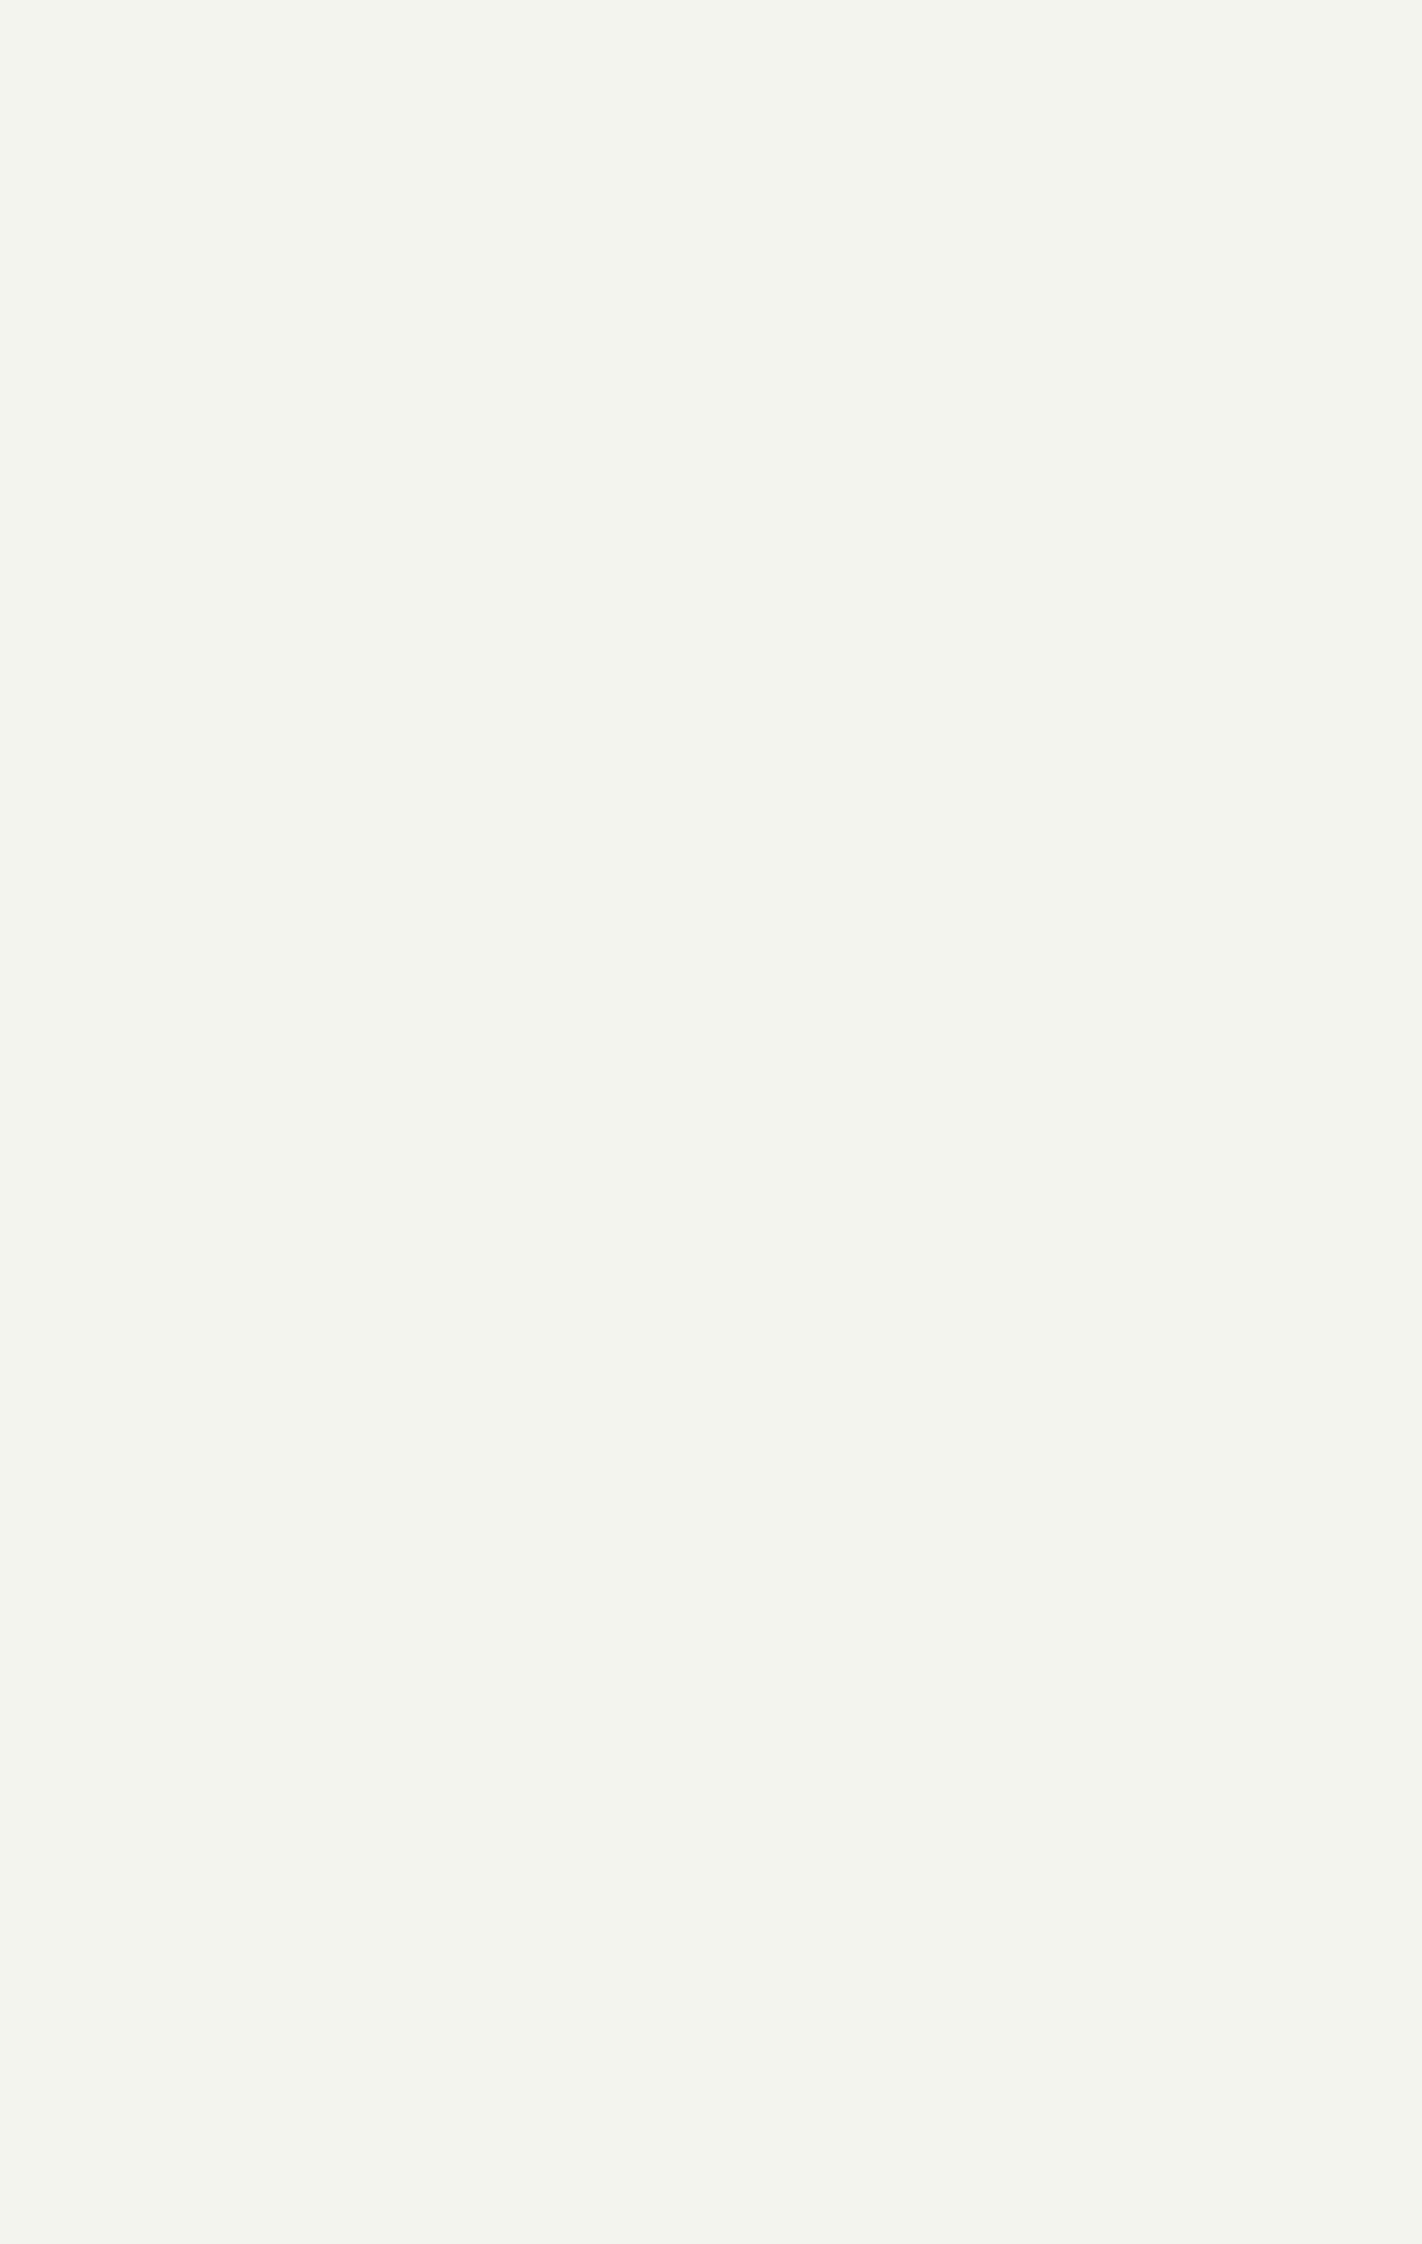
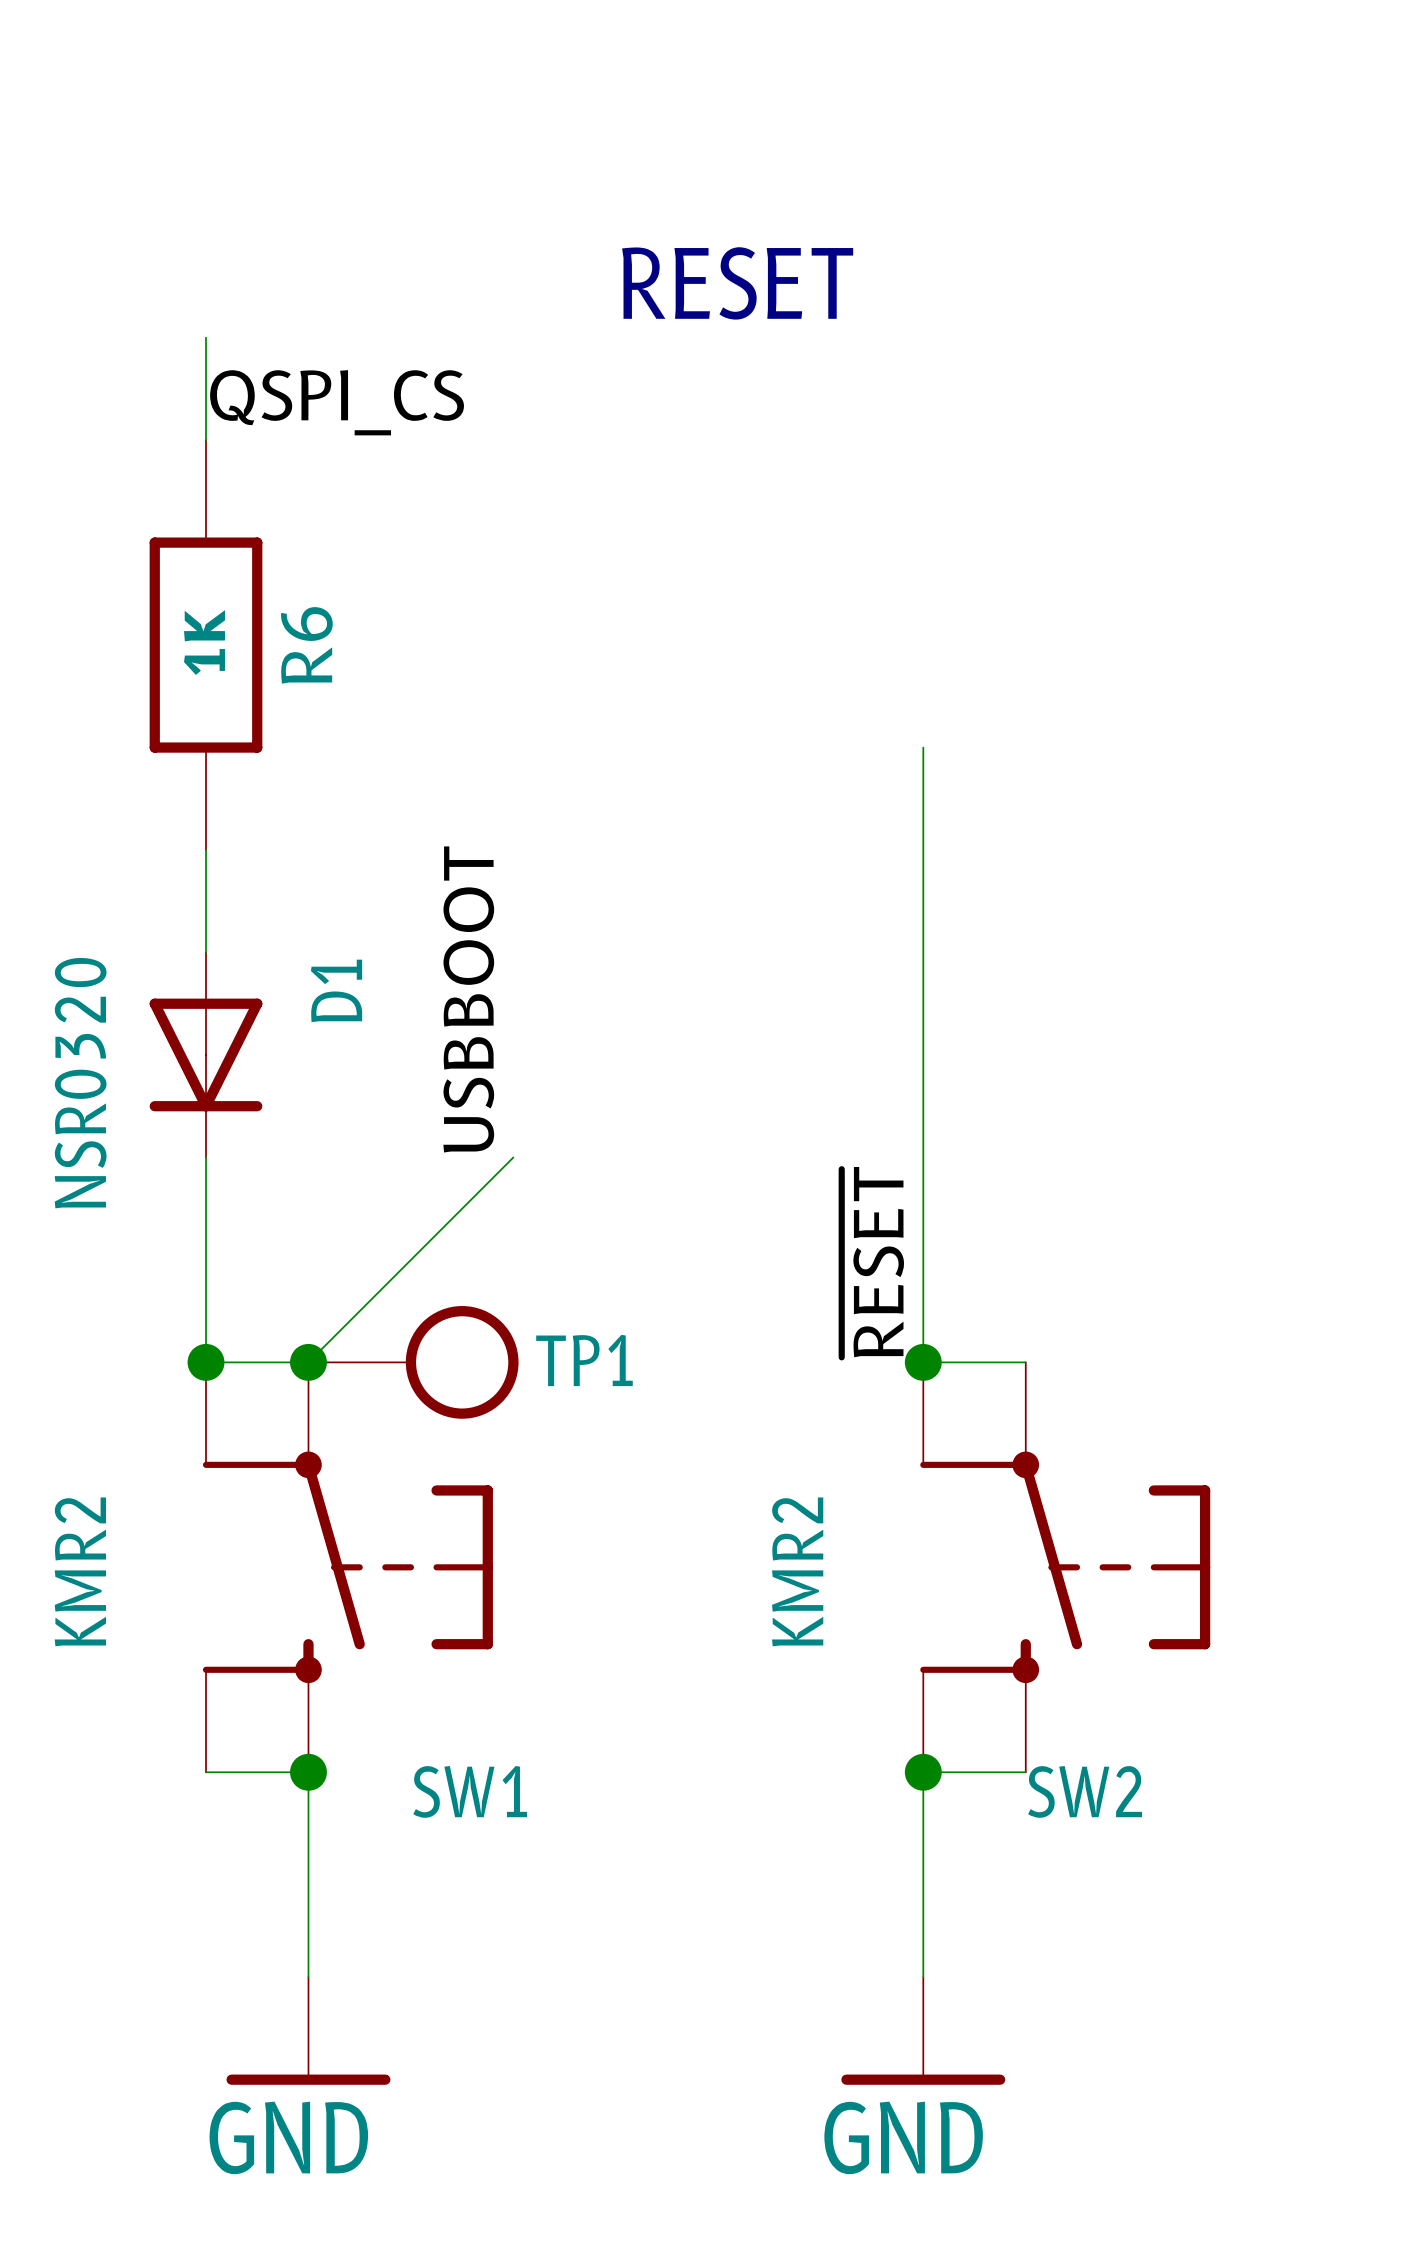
text: none -> RESET (737, 283)
wire: none -> (206, 337) (206, 440)
label: none -> QSPI_CS (337, 402)
R6: none -> 1K (206, 645)
wire: none -> (923, 747) (923, 1362) (1025, 1362)
wire: none -> (206, 850) (206, 952)
label: none -> USBBOOT (468, 999)
D1: none -> NSR0320 (206, 1054)
wire: none -> (206, 1157) (206, 1362) (308, 1362) (513, 1157)
label: none -> ~{RESET} (872, 1262)
junction: none -> (206, 1362)
junction: none -> (308, 1362)
TP1: none -> (413, 1362)
junction: none -> (923, 1362)
SW1: none -> KMR2 (347, 1567)
SW2: none -> KMR2 (1065, 1567)
wire: none -> (206, 1772) (308, 1772) (308, 1977)
junction: none -> (308, 1772)
junction: none -> (923, 1772)
wire: none -> (1025, 1772) (923, 1772) (923, 1977)
power symbol: none -> GND (308, 2031)
power symbol: none -> GND (923, 2031)

